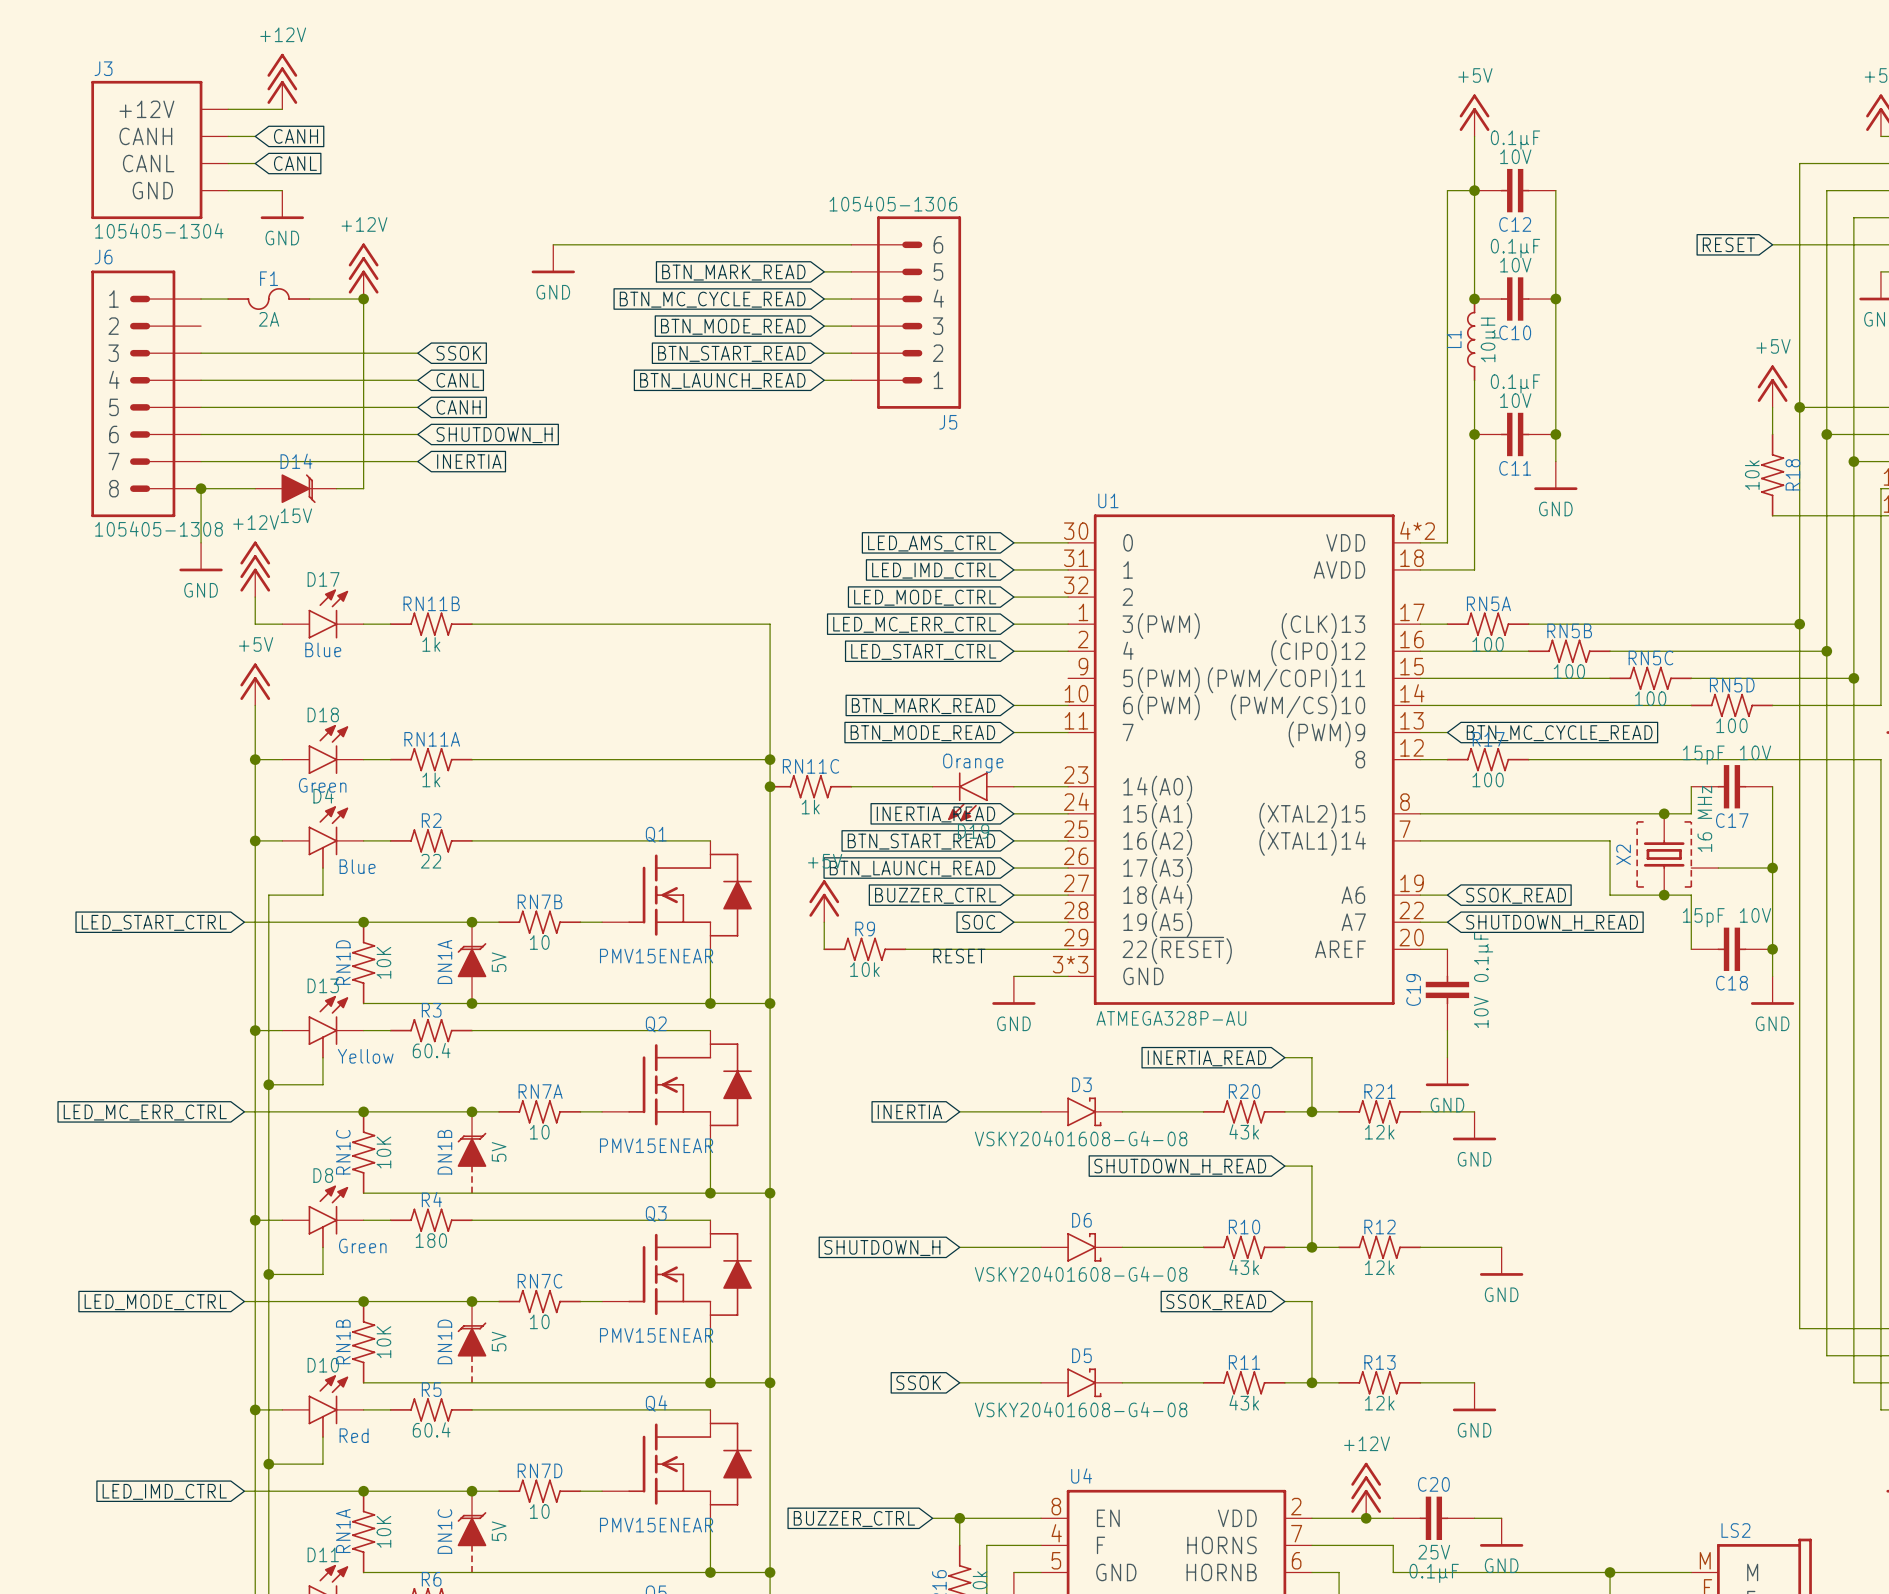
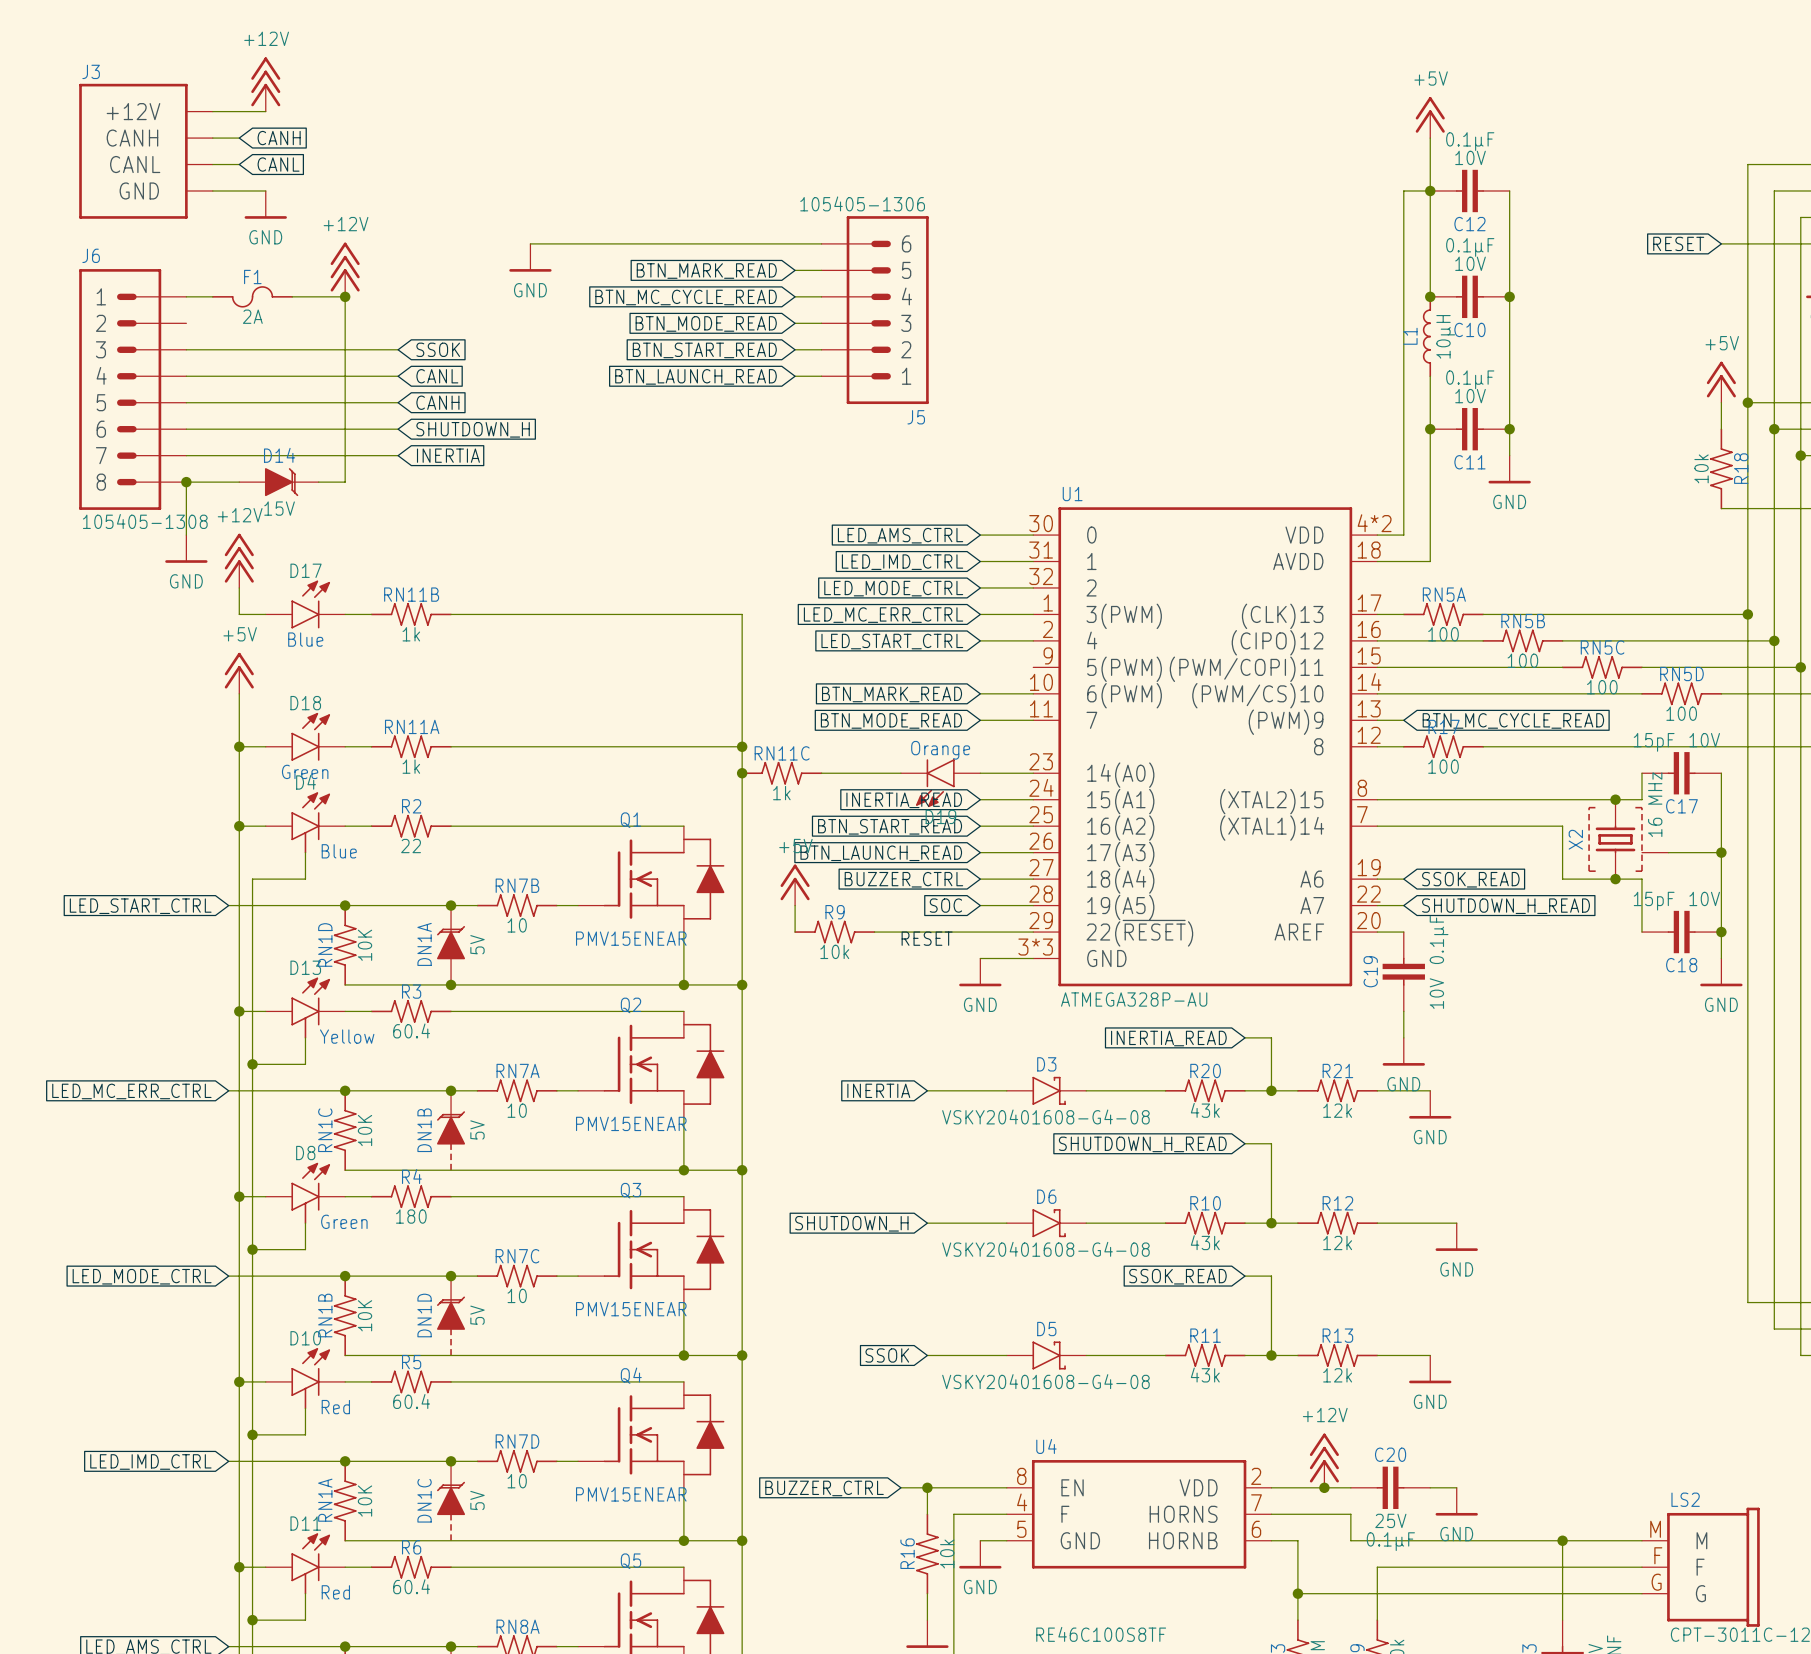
J3 text: 105405-1304 (159, 230) -> none

